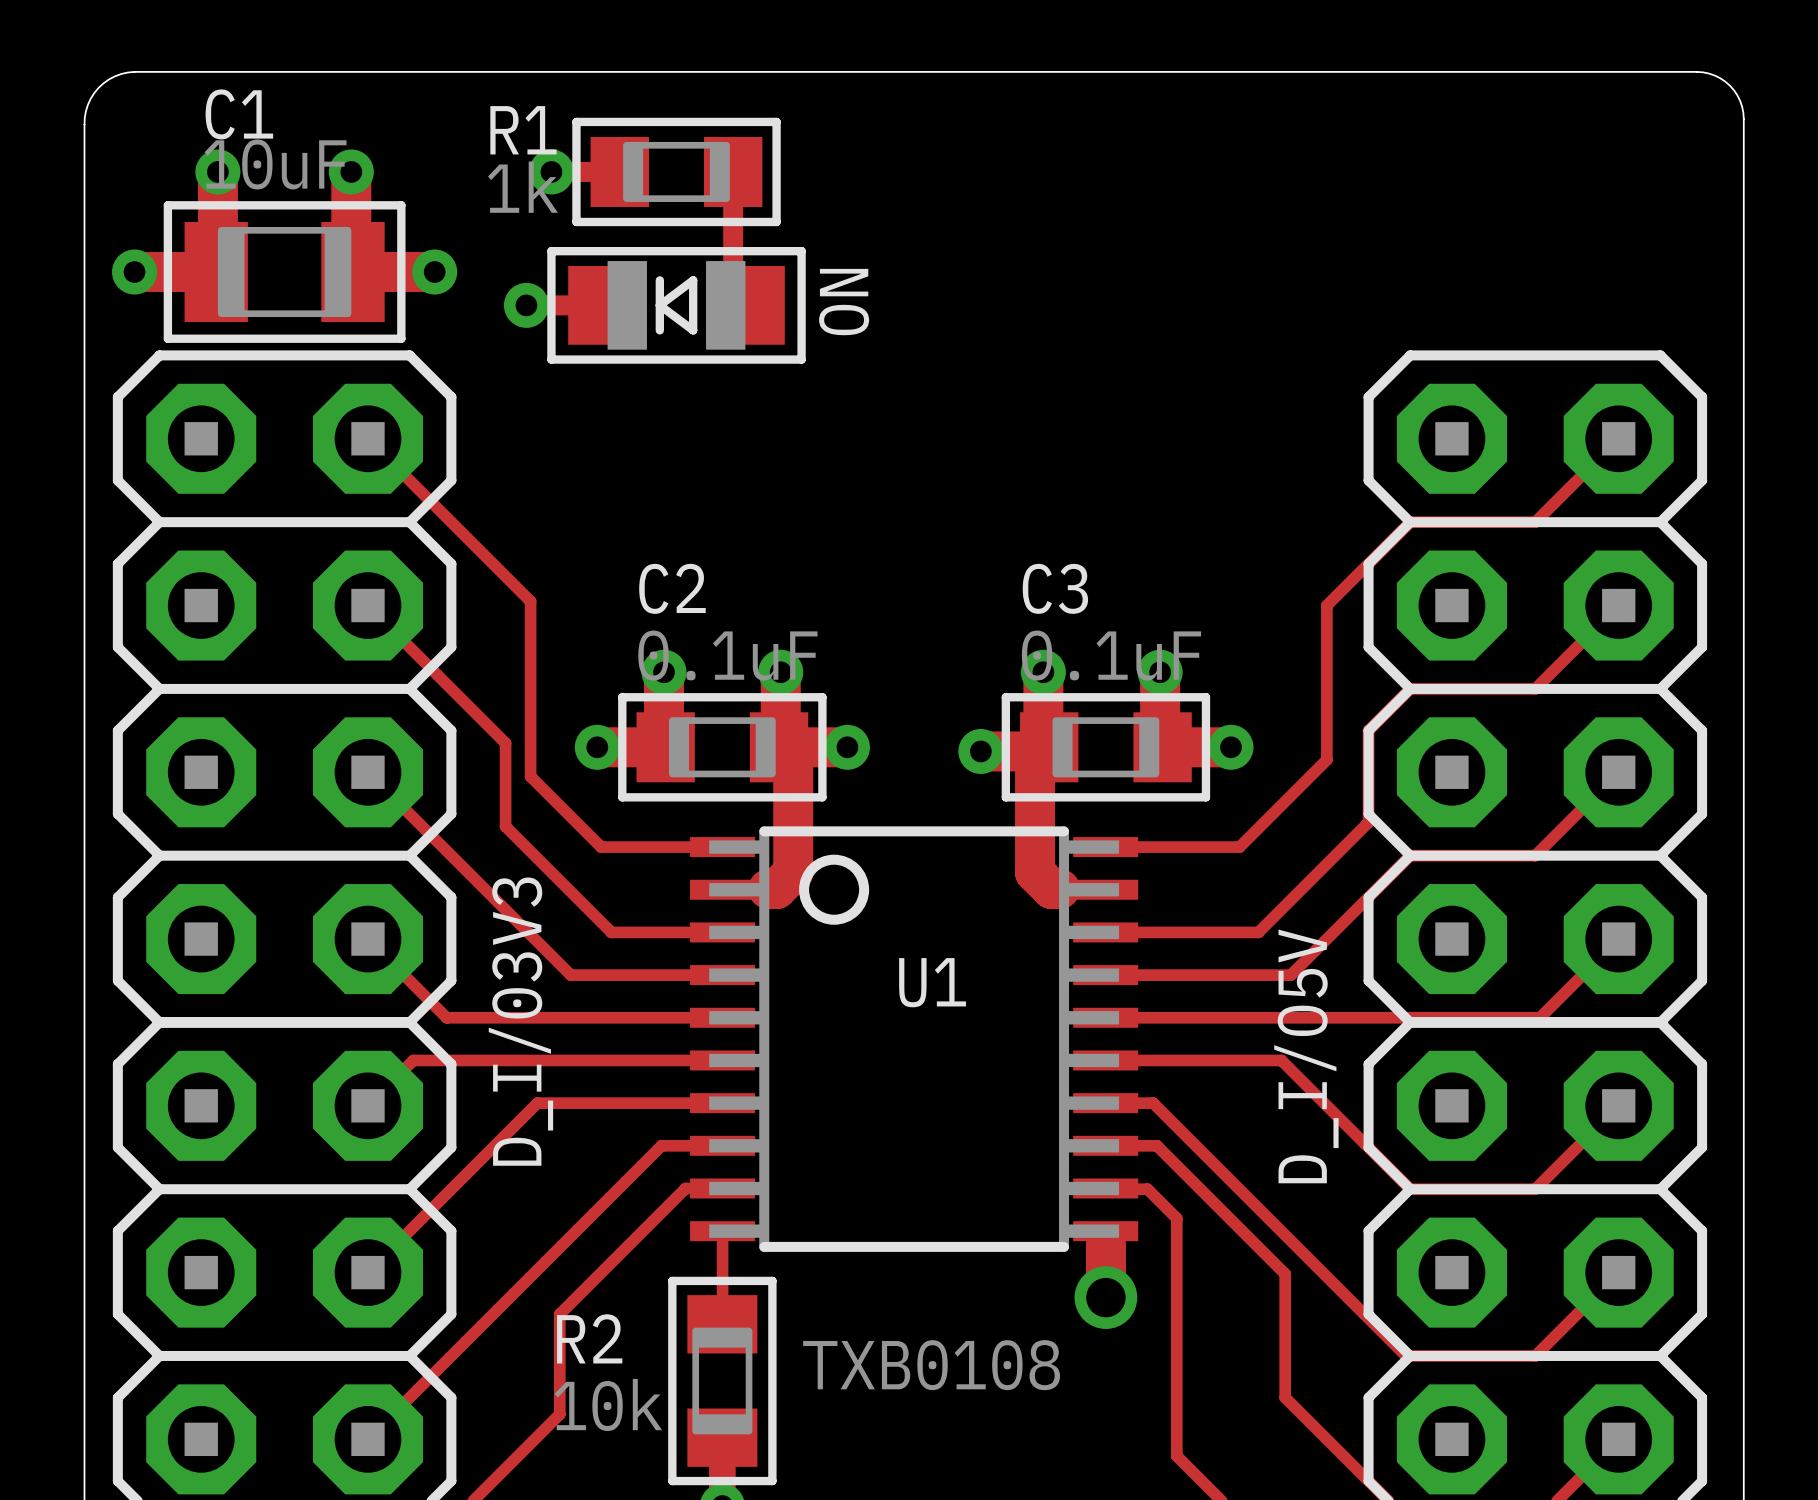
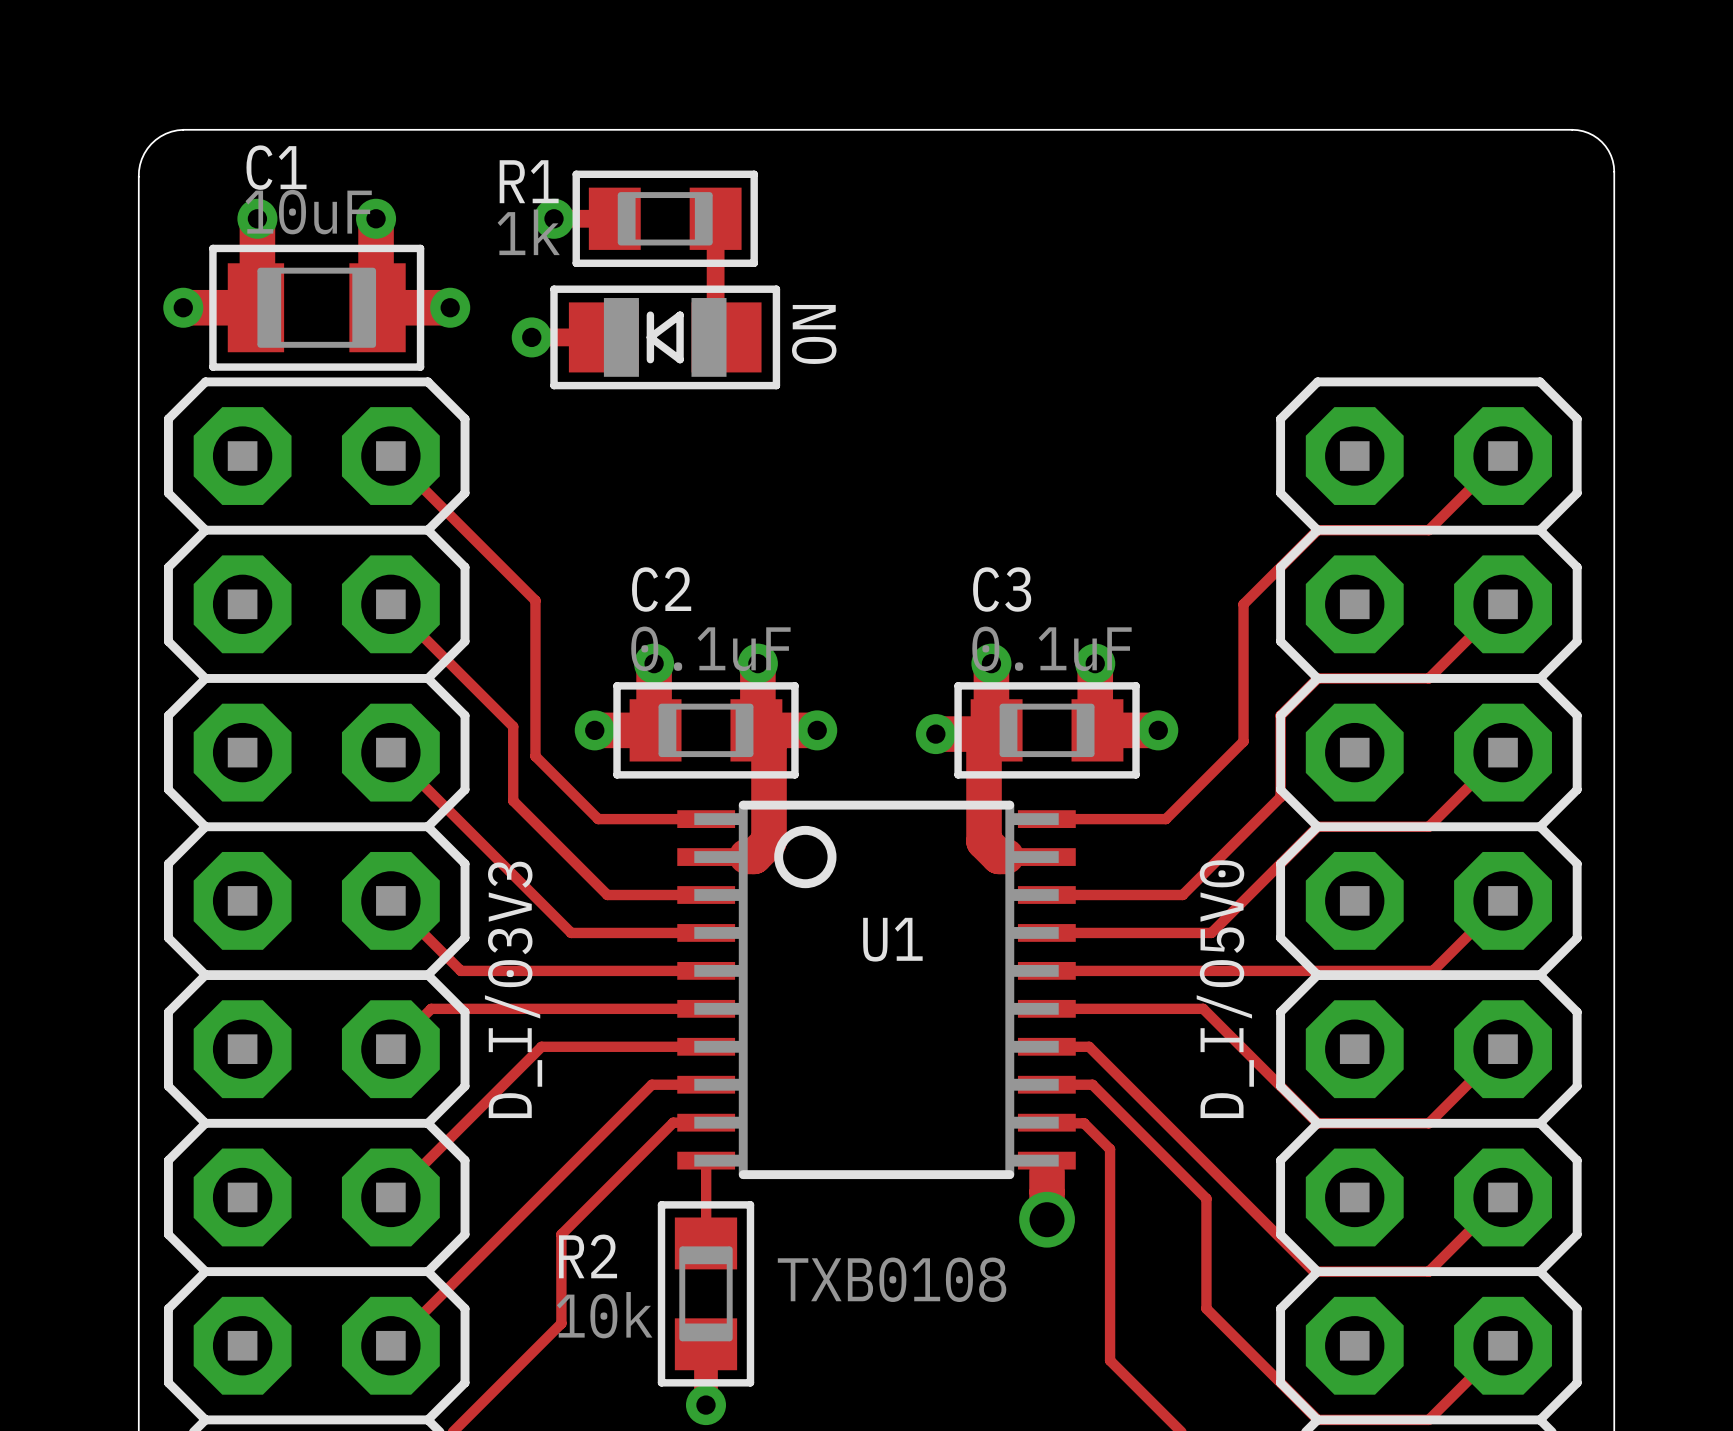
D_I/03V3 name position: D_I/03V3 (520, 1021) -> D_I/03V3 (513, 989)
D_I/O5V name: D_I/O5V (1306, 1056) -> D_I/O5V0 (1225, 989)

